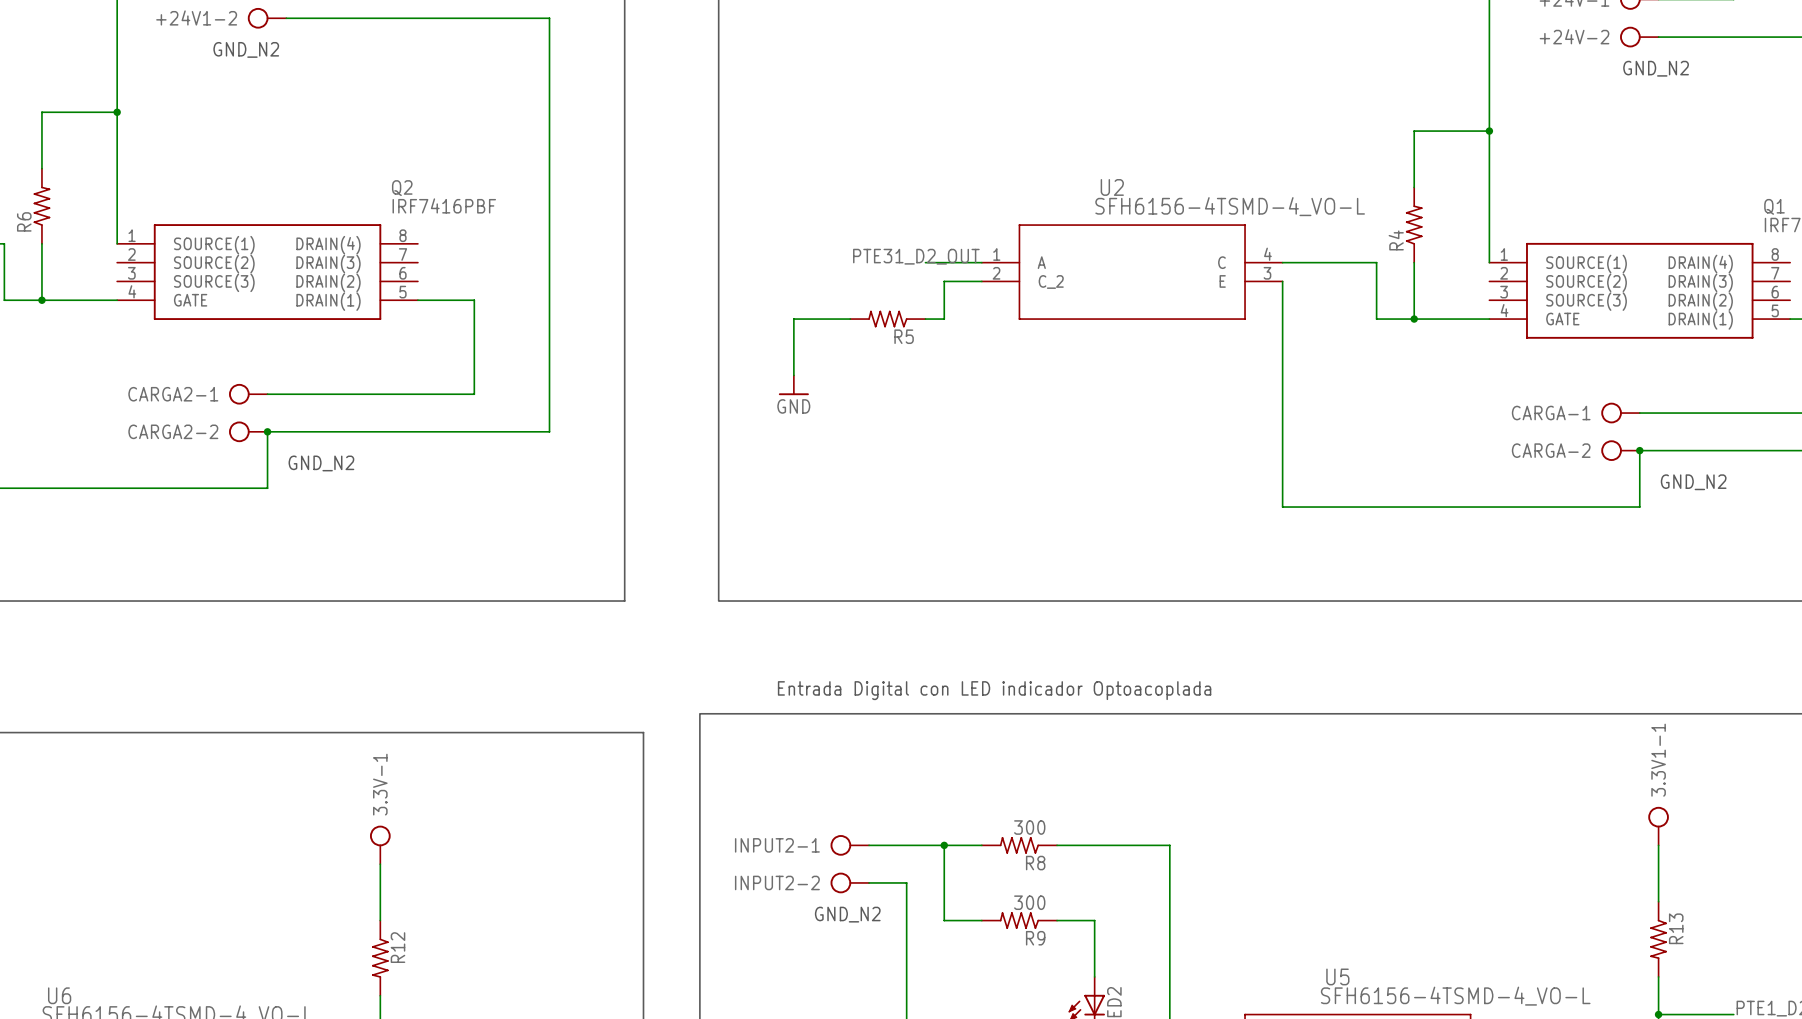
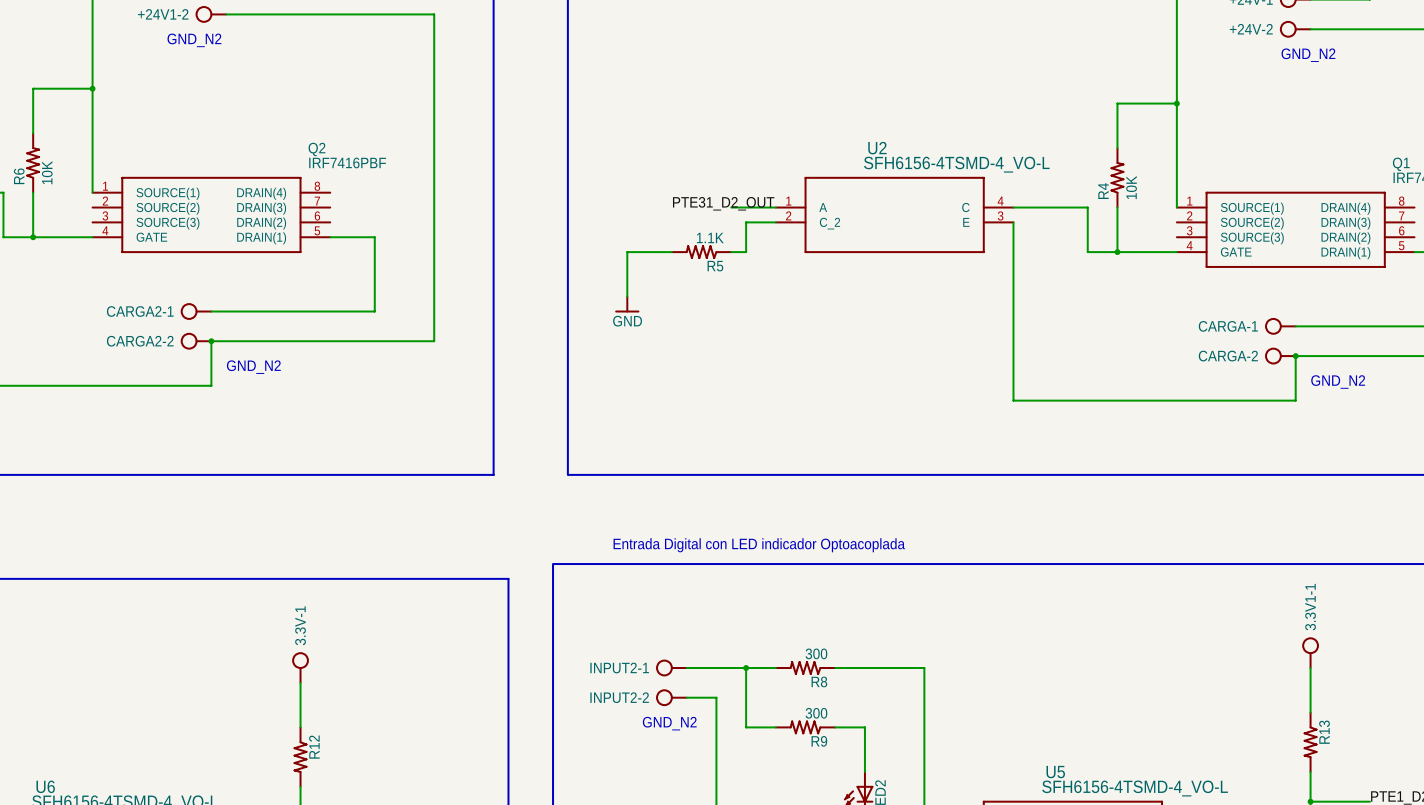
R6 value: none -> 10K (47, 172)
R4 value: none -> 10K (1131, 187)
R5 value: none -> 1.1K (710, 237)

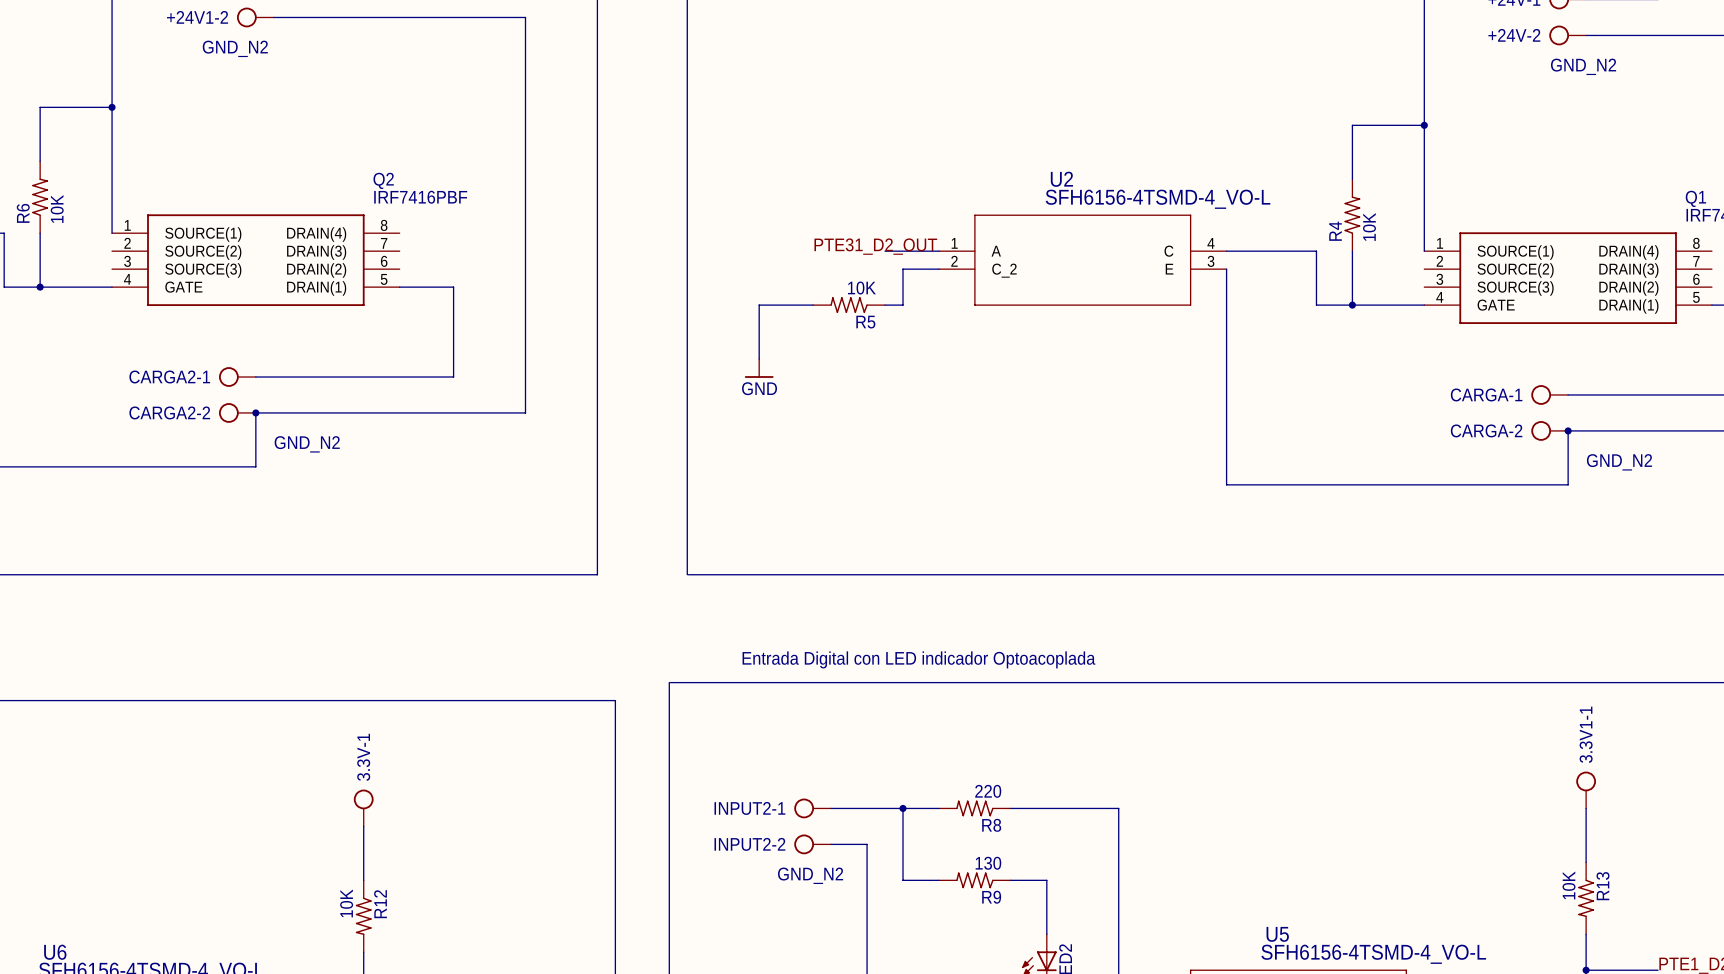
R5 value: 1.1K (710, 237) -> 10K (861, 288)
R8 value: 300 (816, 653) -> 220 (988, 791)
R9 value: 300 (816, 713) -> 130 (988, 863)
R13 value: none -> 10K (1569, 885)
R12 value: none -> 10K (346, 903)

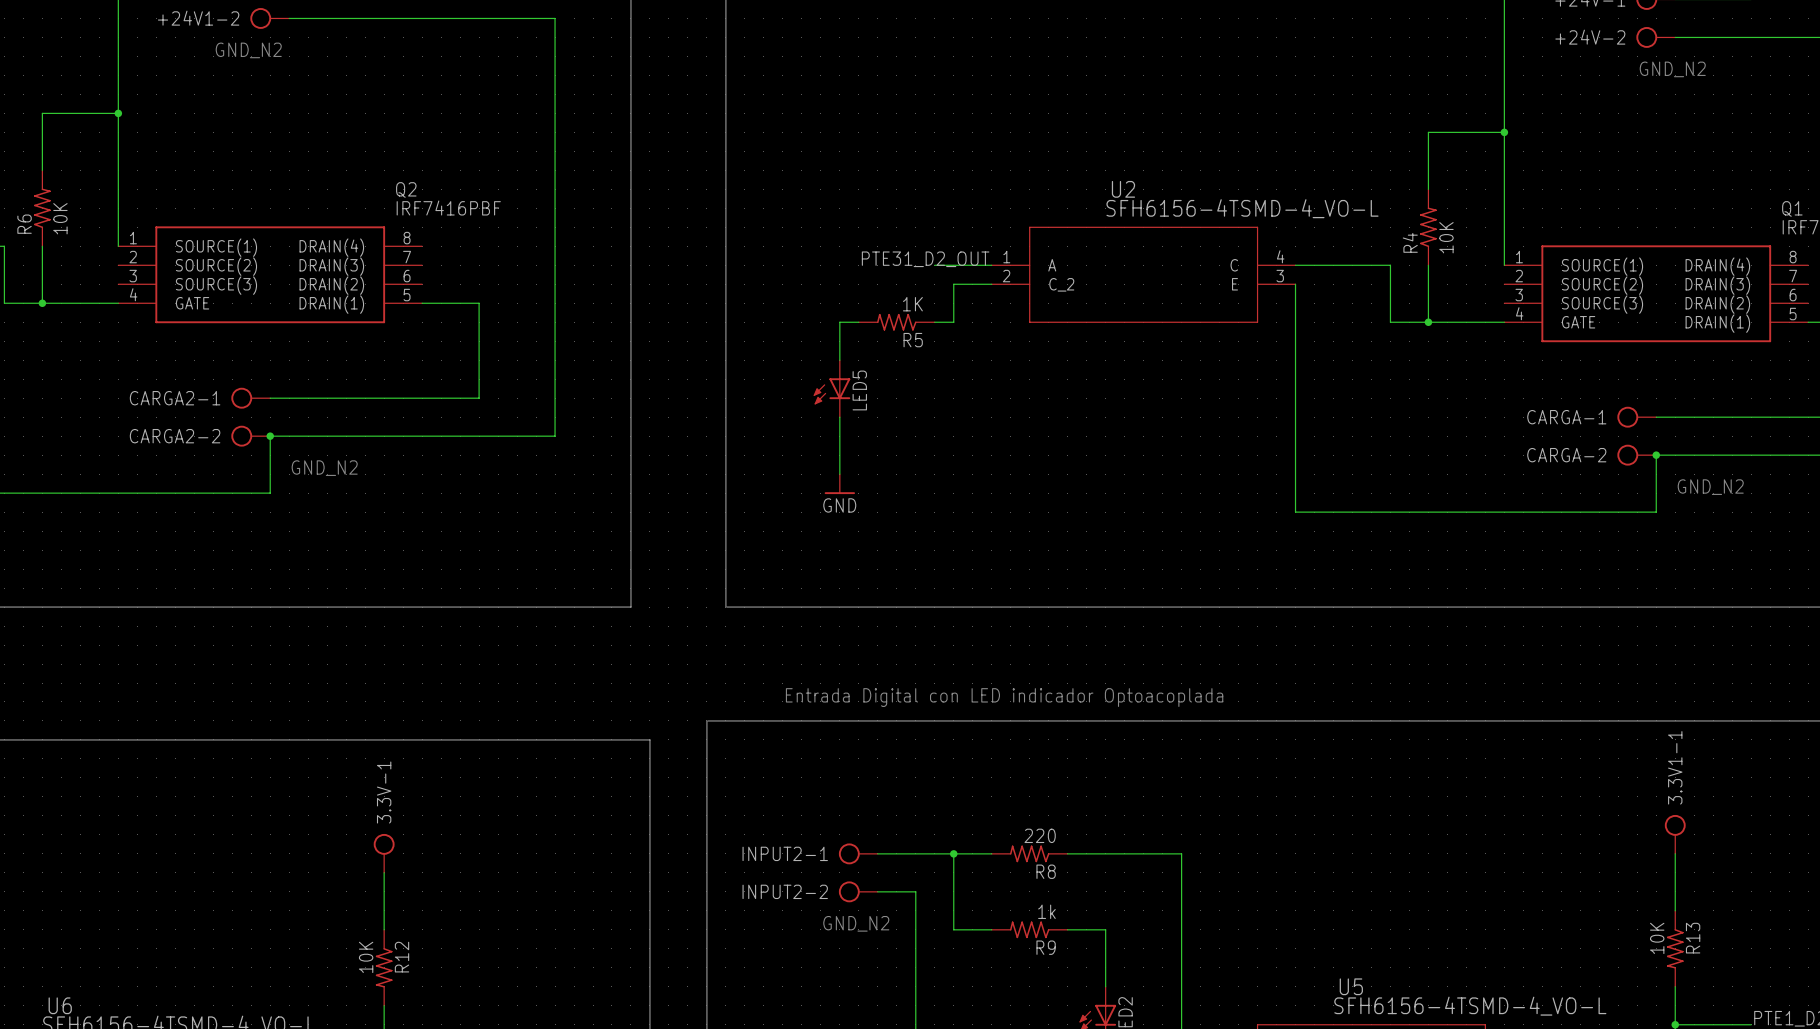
R5 value: 10K (861, 288) -> 1K (912, 304)
wire: (795, 305) (759, 305) (759, 359) -> (839, 322) (839, 360)
power symbol position: GND (759, 368) -> GND (839, 484)
LED5: none -> (831, 388)
wire: none -> (839, 417) (839, 474)
R9 value: 130 (988, 863) -> 1k (1046, 911)

